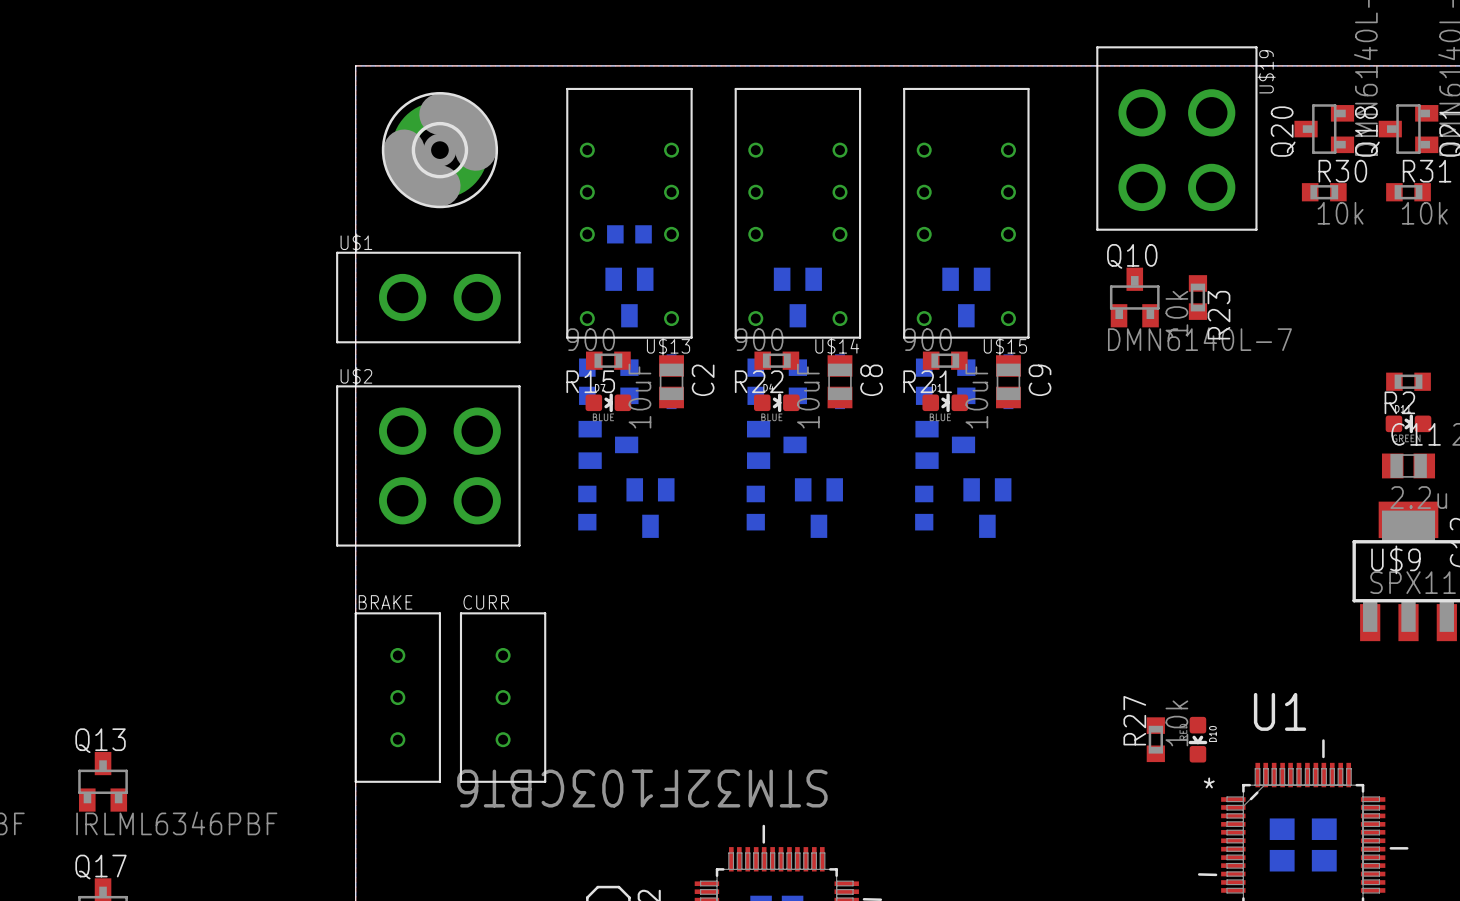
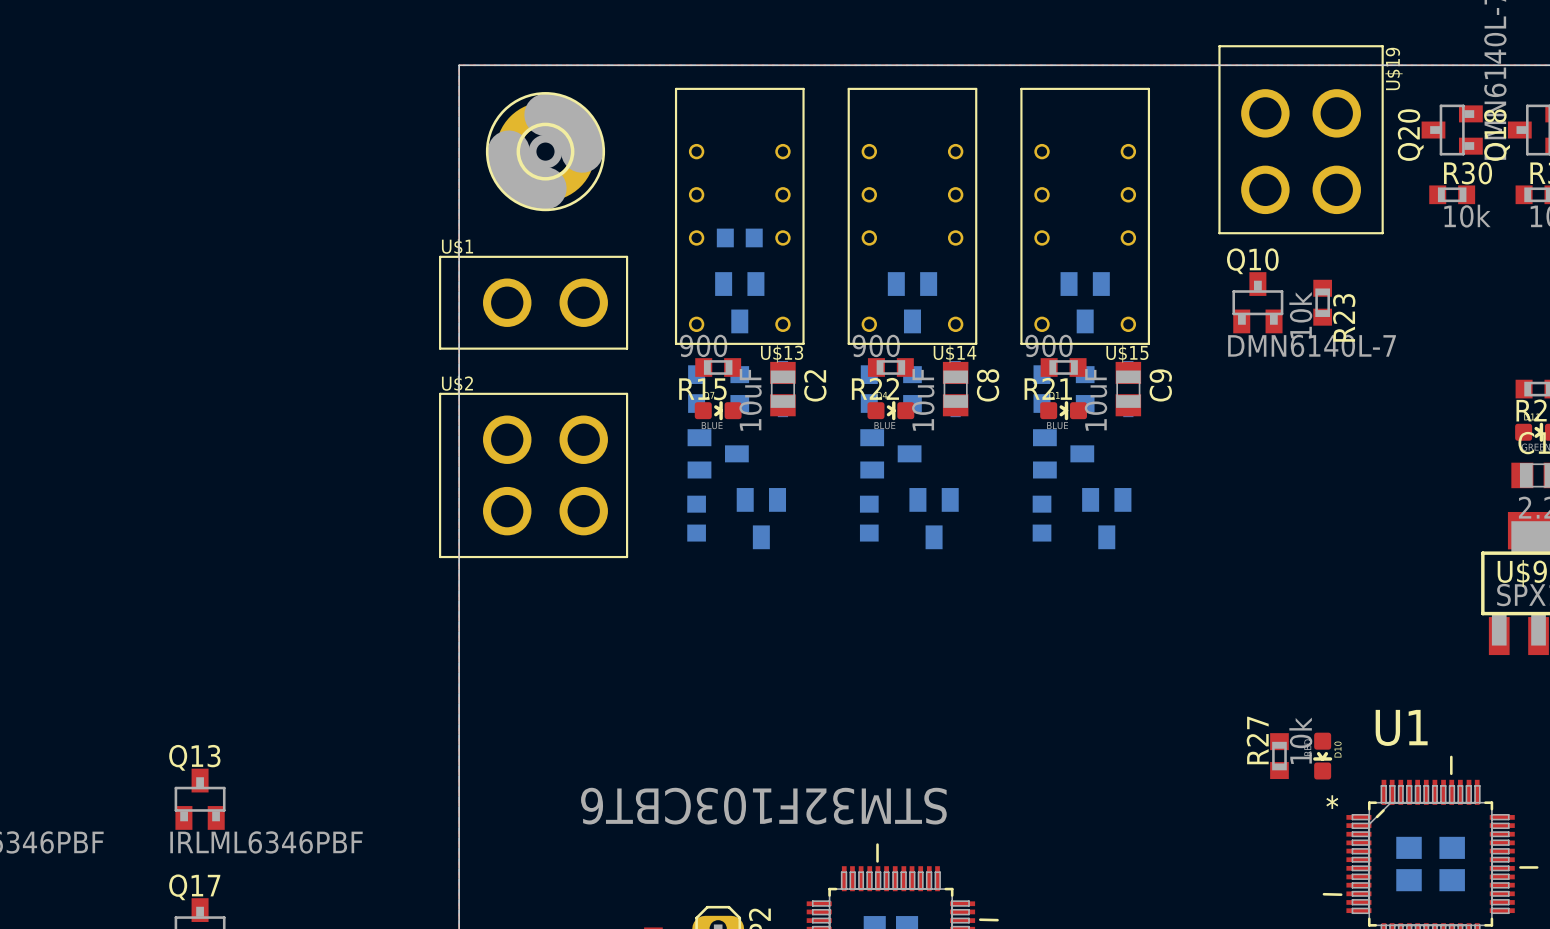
BRAKE: (397, 697) -> none
CURR: (503, 697) -> none

